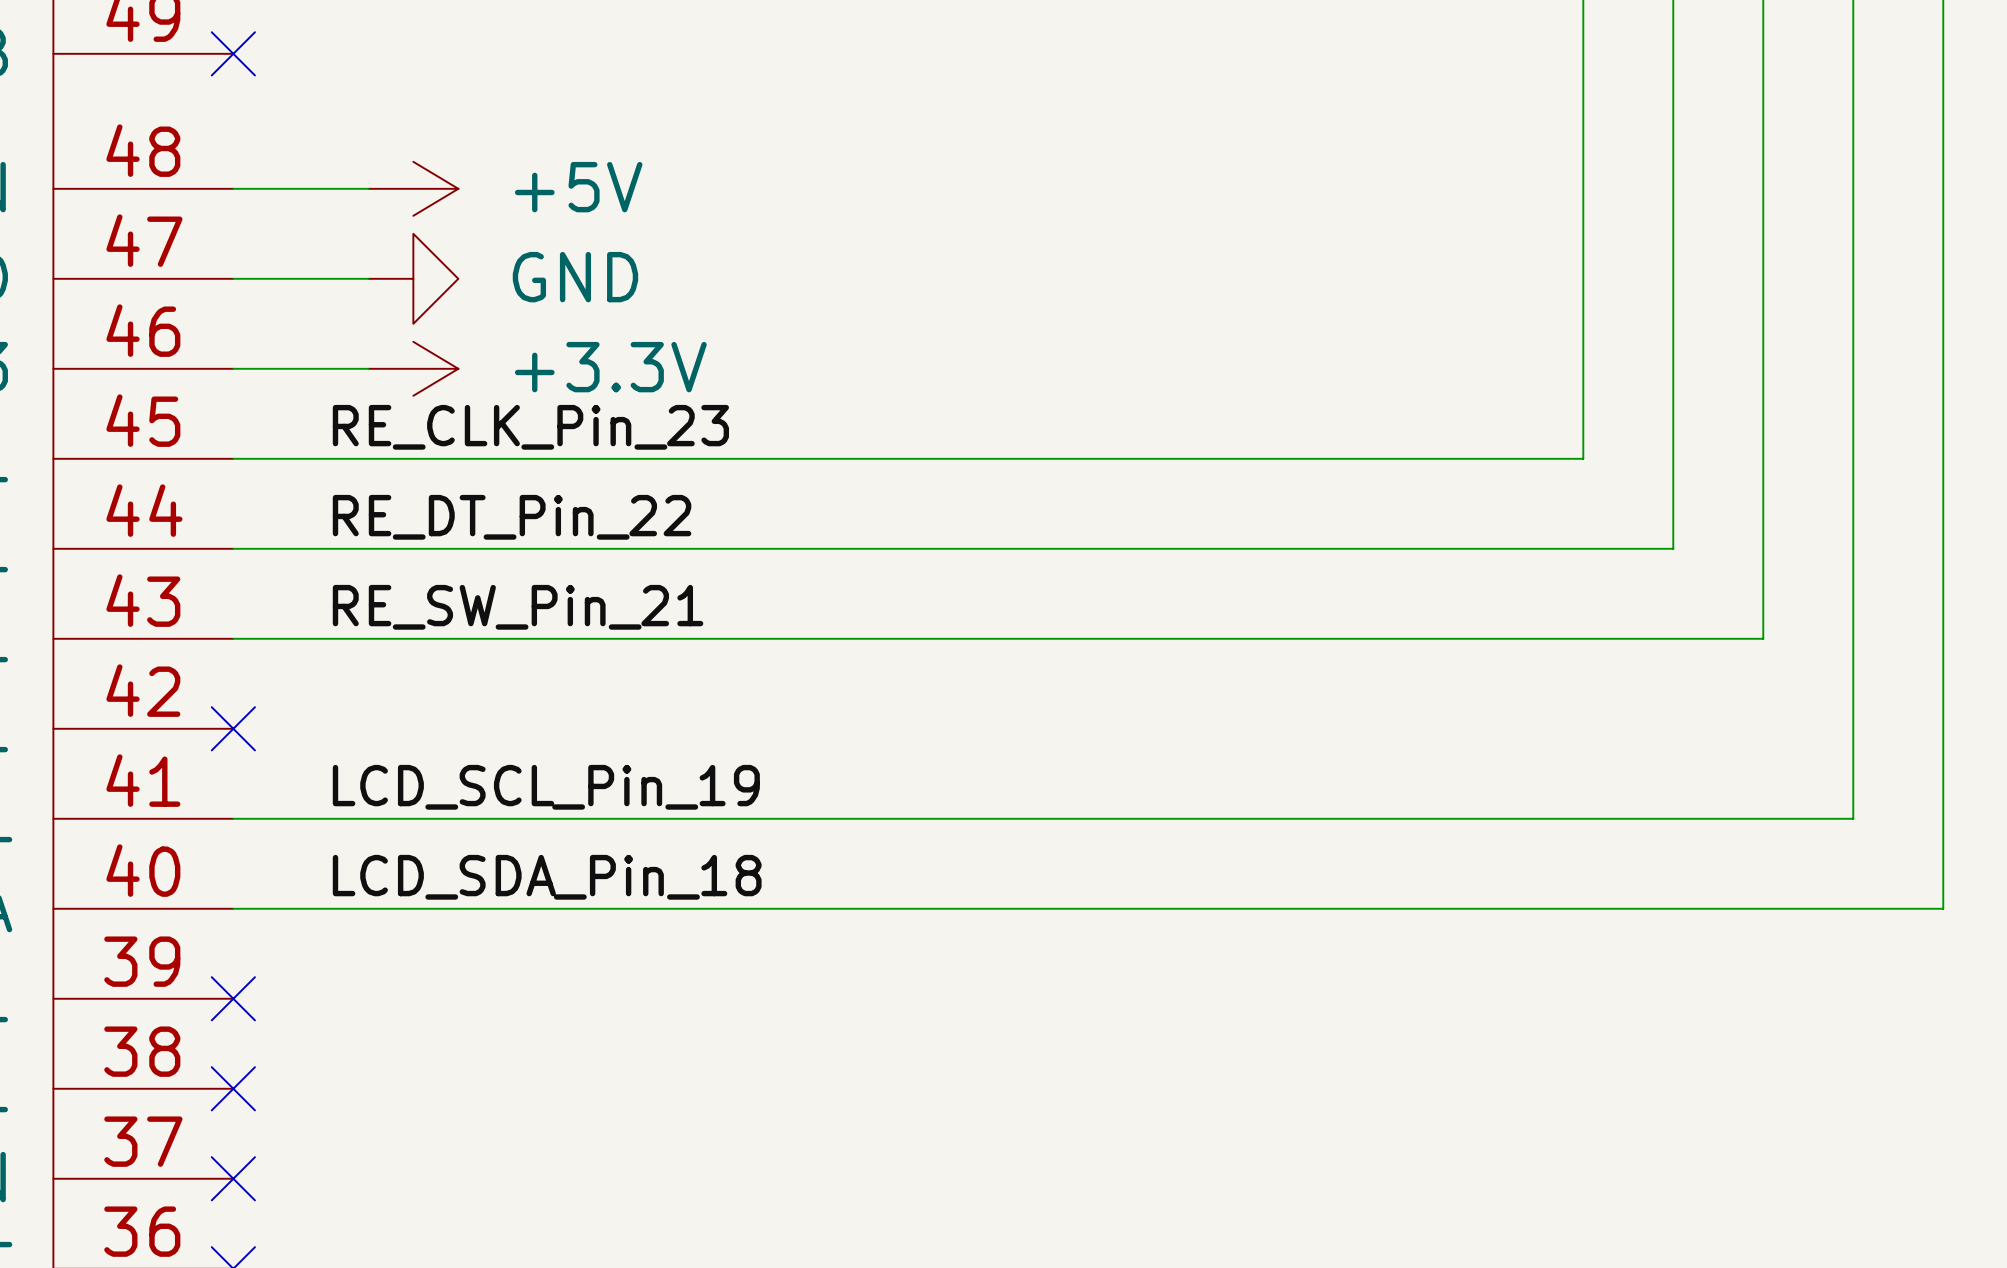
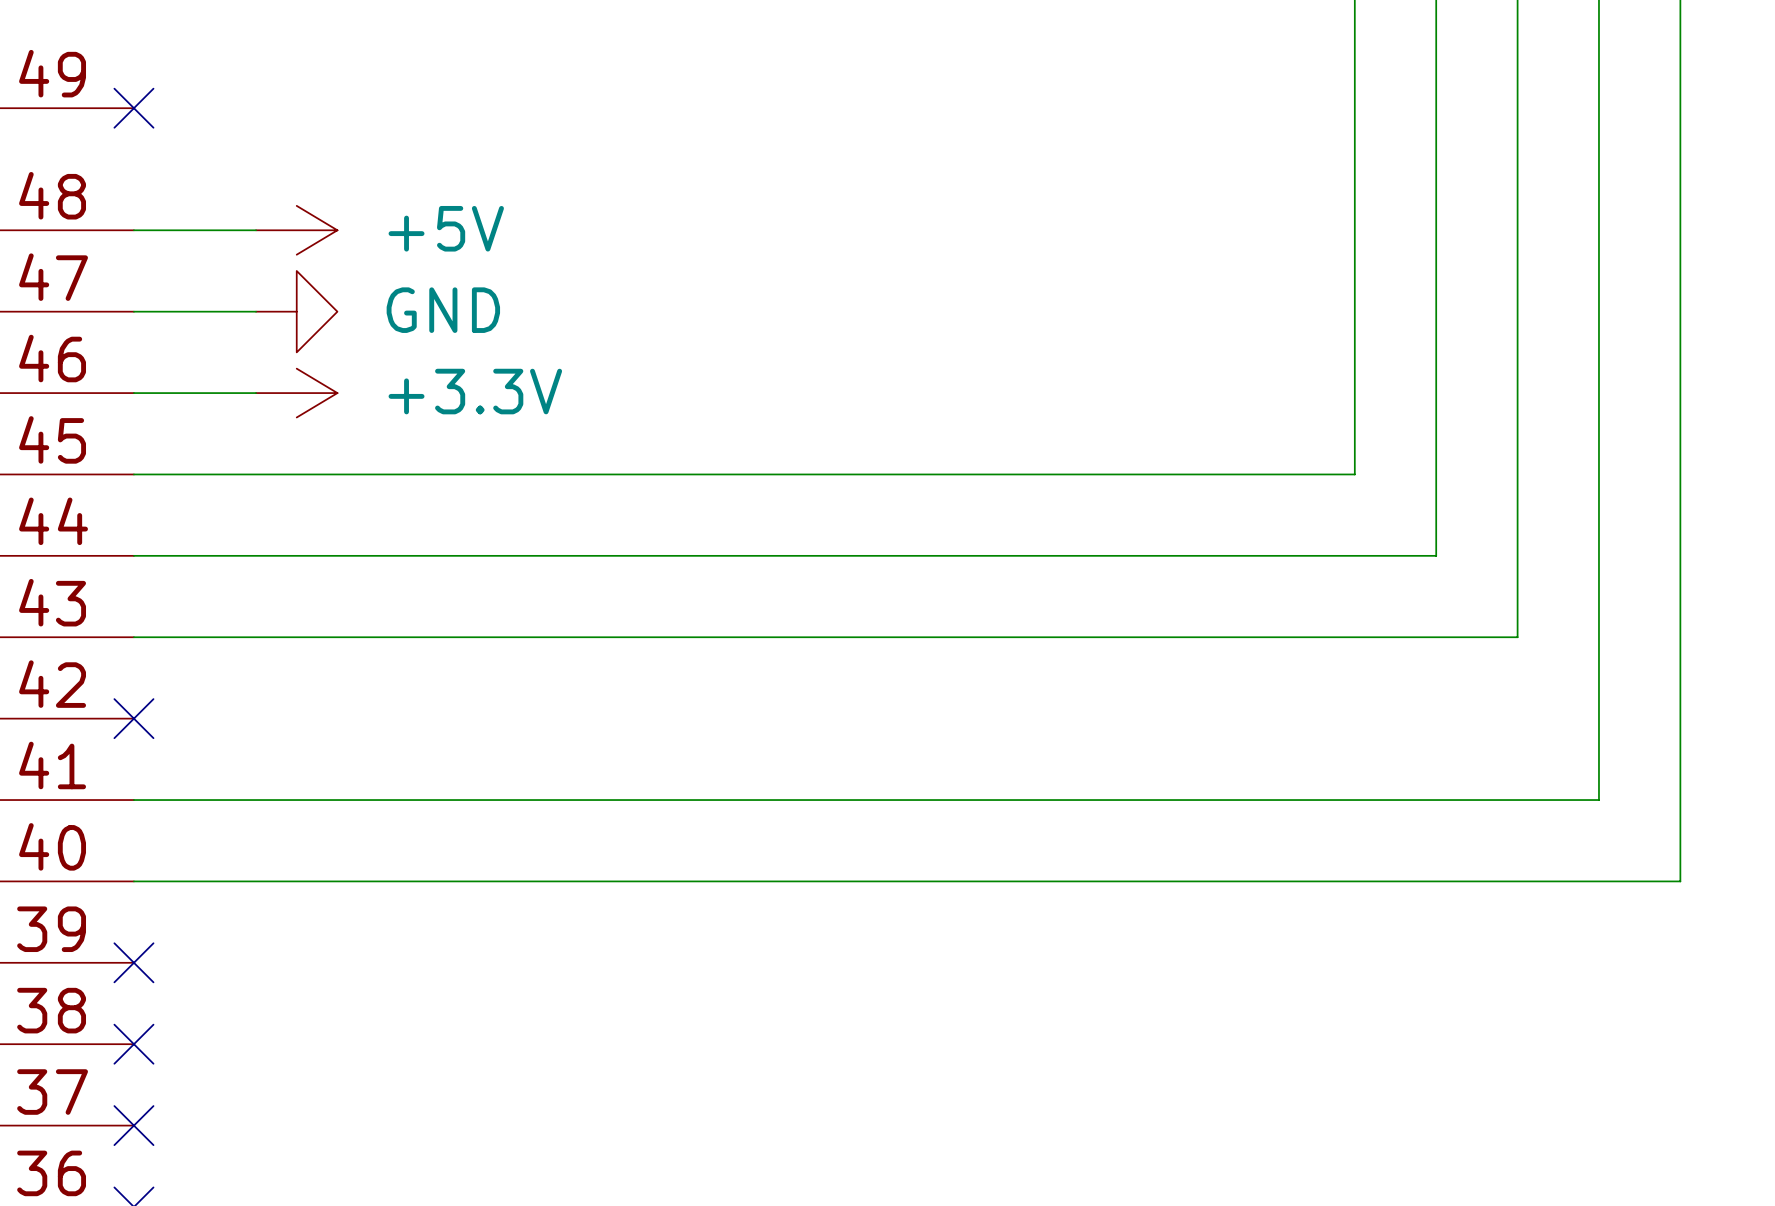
label: RE_CLK_Pin_23 (530, 427) -> none
label: RE_DT_Pin_22 (512, 517) -> none
label: RE_SW_Pin_21 (518, 607) -> none
label: LCD_SCL_Pin_19 (546, 787) -> none
label: LCD_SDA_Pin_18 (547, 877) -> none

